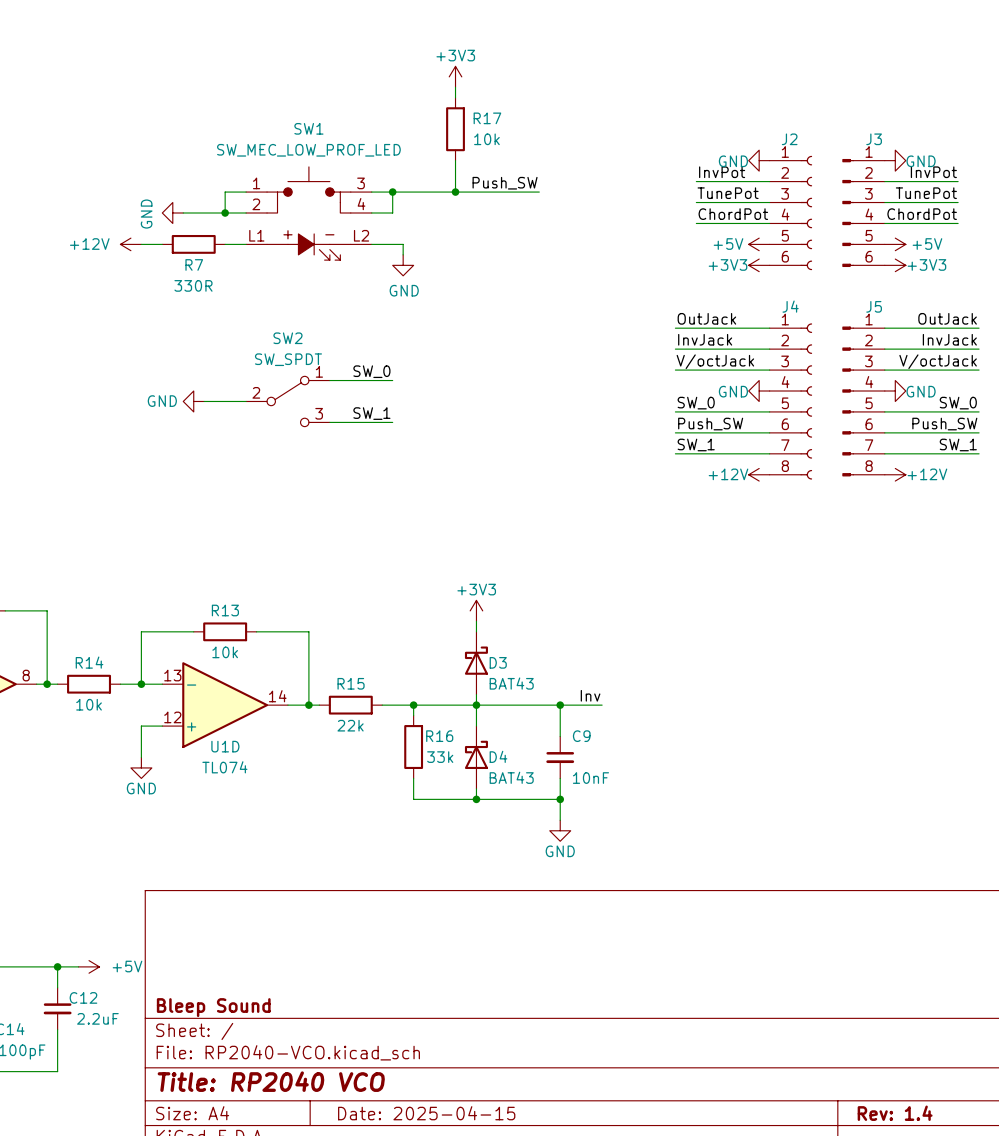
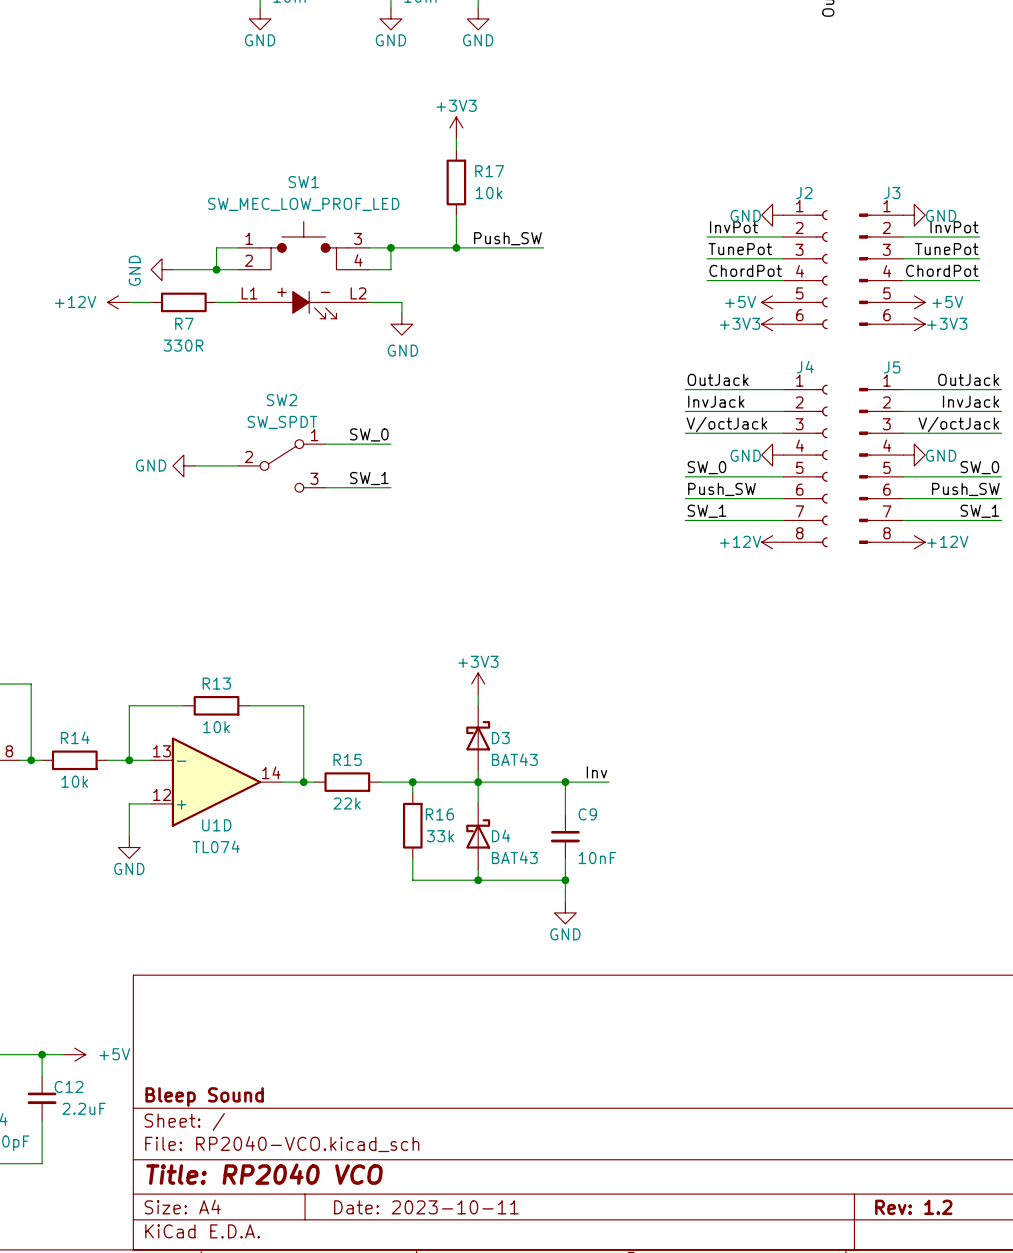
title block: Date: 2025-04-15 (426, 1113) -> Date: 2023-10-11 (426, 1207)
title block: Rev: 1.4 (895, 1113) -> Rev: 1.2 (913, 1207)

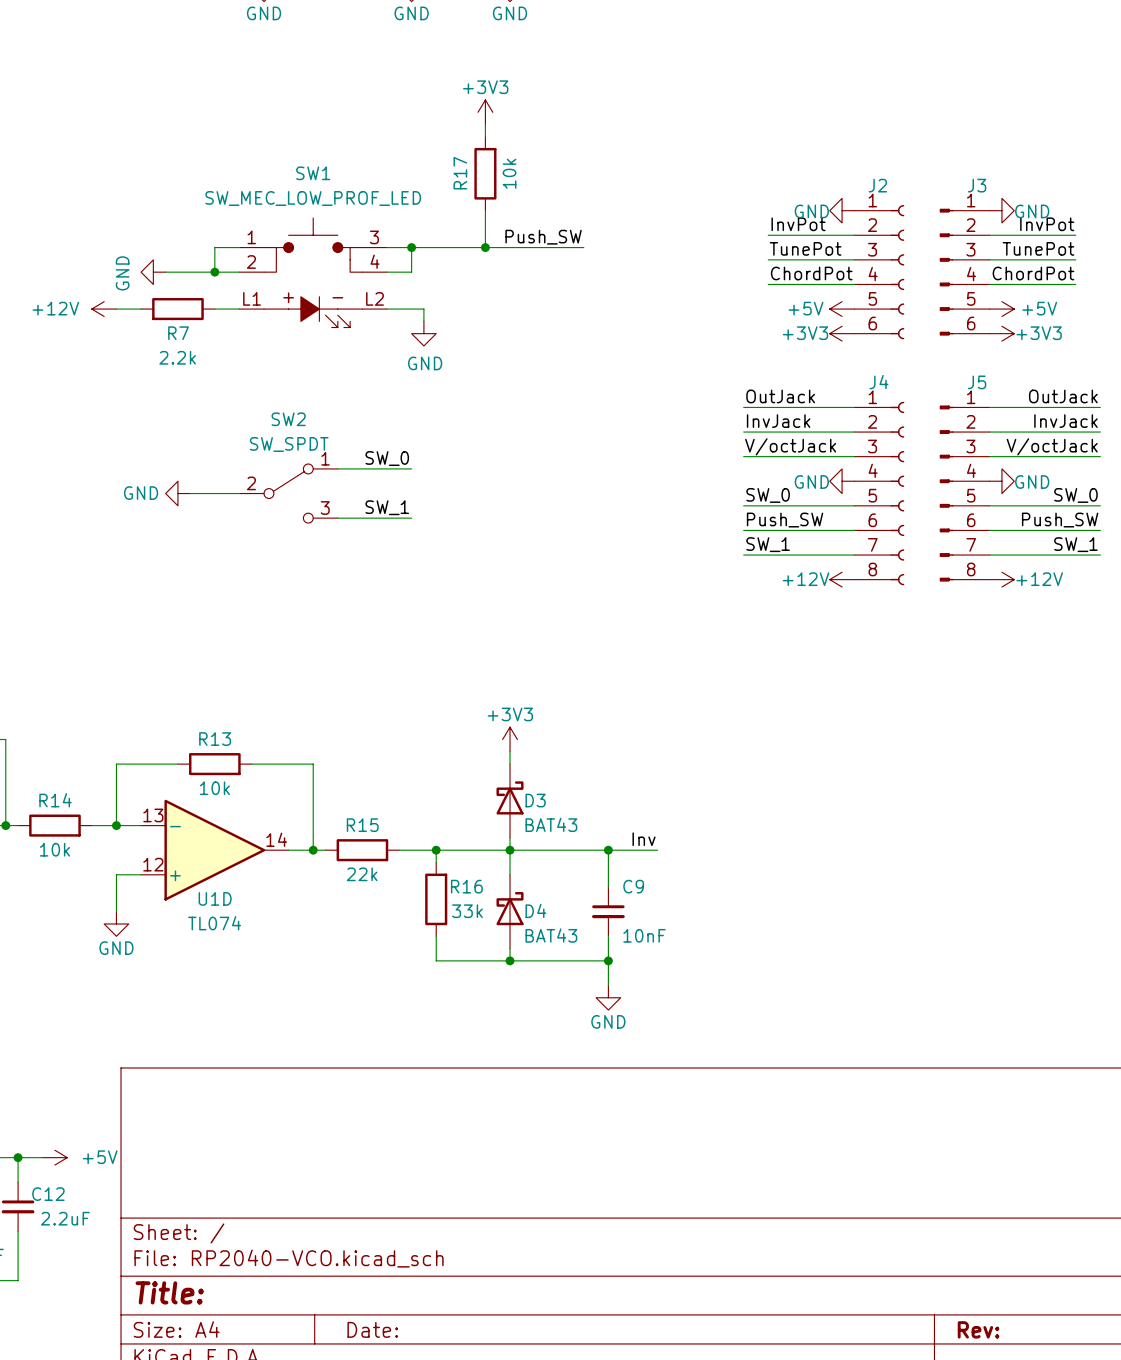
R17 name rotation: 0° (489, 171) -> 90° counterclockwise (460, 173)
R17 name position: R17 (489, 171) -> R17 (460, 173)
R17 value rotation: 0° (489, 192) -> 90° counterclockwise (509, 173)
R7 value: 330R (183, 345) -> 2.2k (177, 357)
title block: Bleep Sound (204, 1097) -> none
title block: Title: RP2040 VCO (264, 1174) -> Title: (169, 1292)
title block: Date: 2023-10-11 (426, 1207) -> Date: (372, 1329)
title block: Rev: 1.2 (913, 1207) -> Rev: (978, 1329)

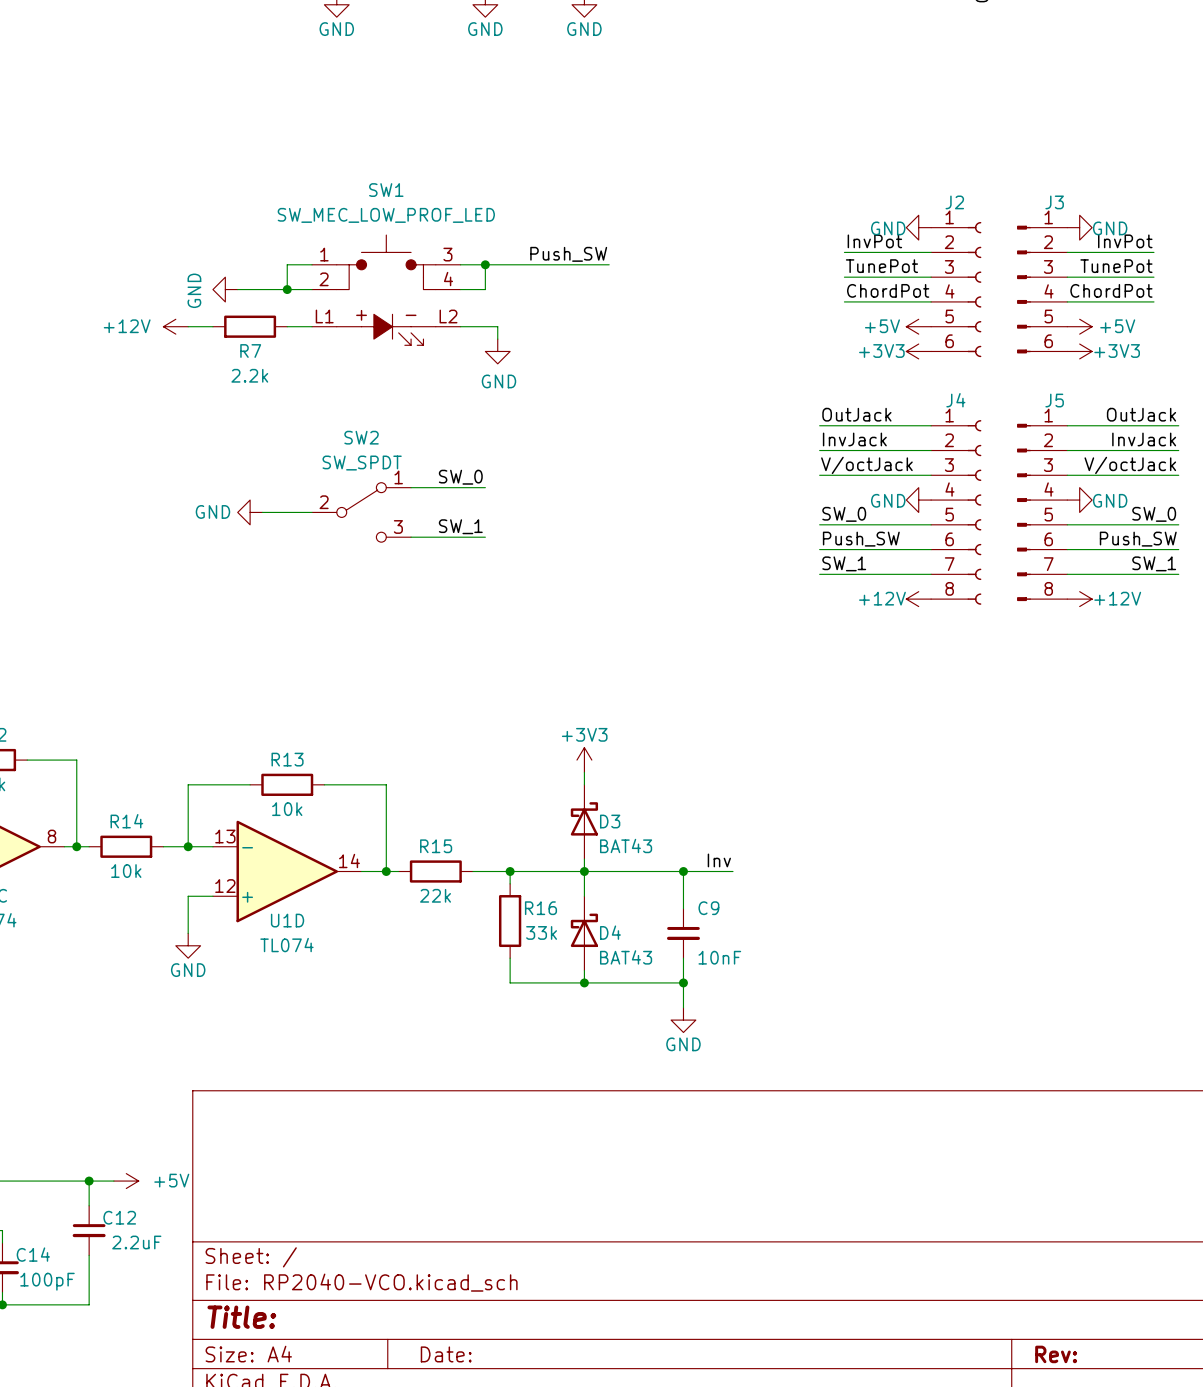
power symbol: +3V3 (485, 112) -> none
wire: (485, 124) (485, 136) -> none
R17: 10k (485, 173) -> none
wire: (485, 210) (485, 247) -> none
label position: Push_SW (543, 237) -> Push_SW (568, 254)
junction: (485, 247) -> none
wire: (534, 247) (583, 247) -> none

